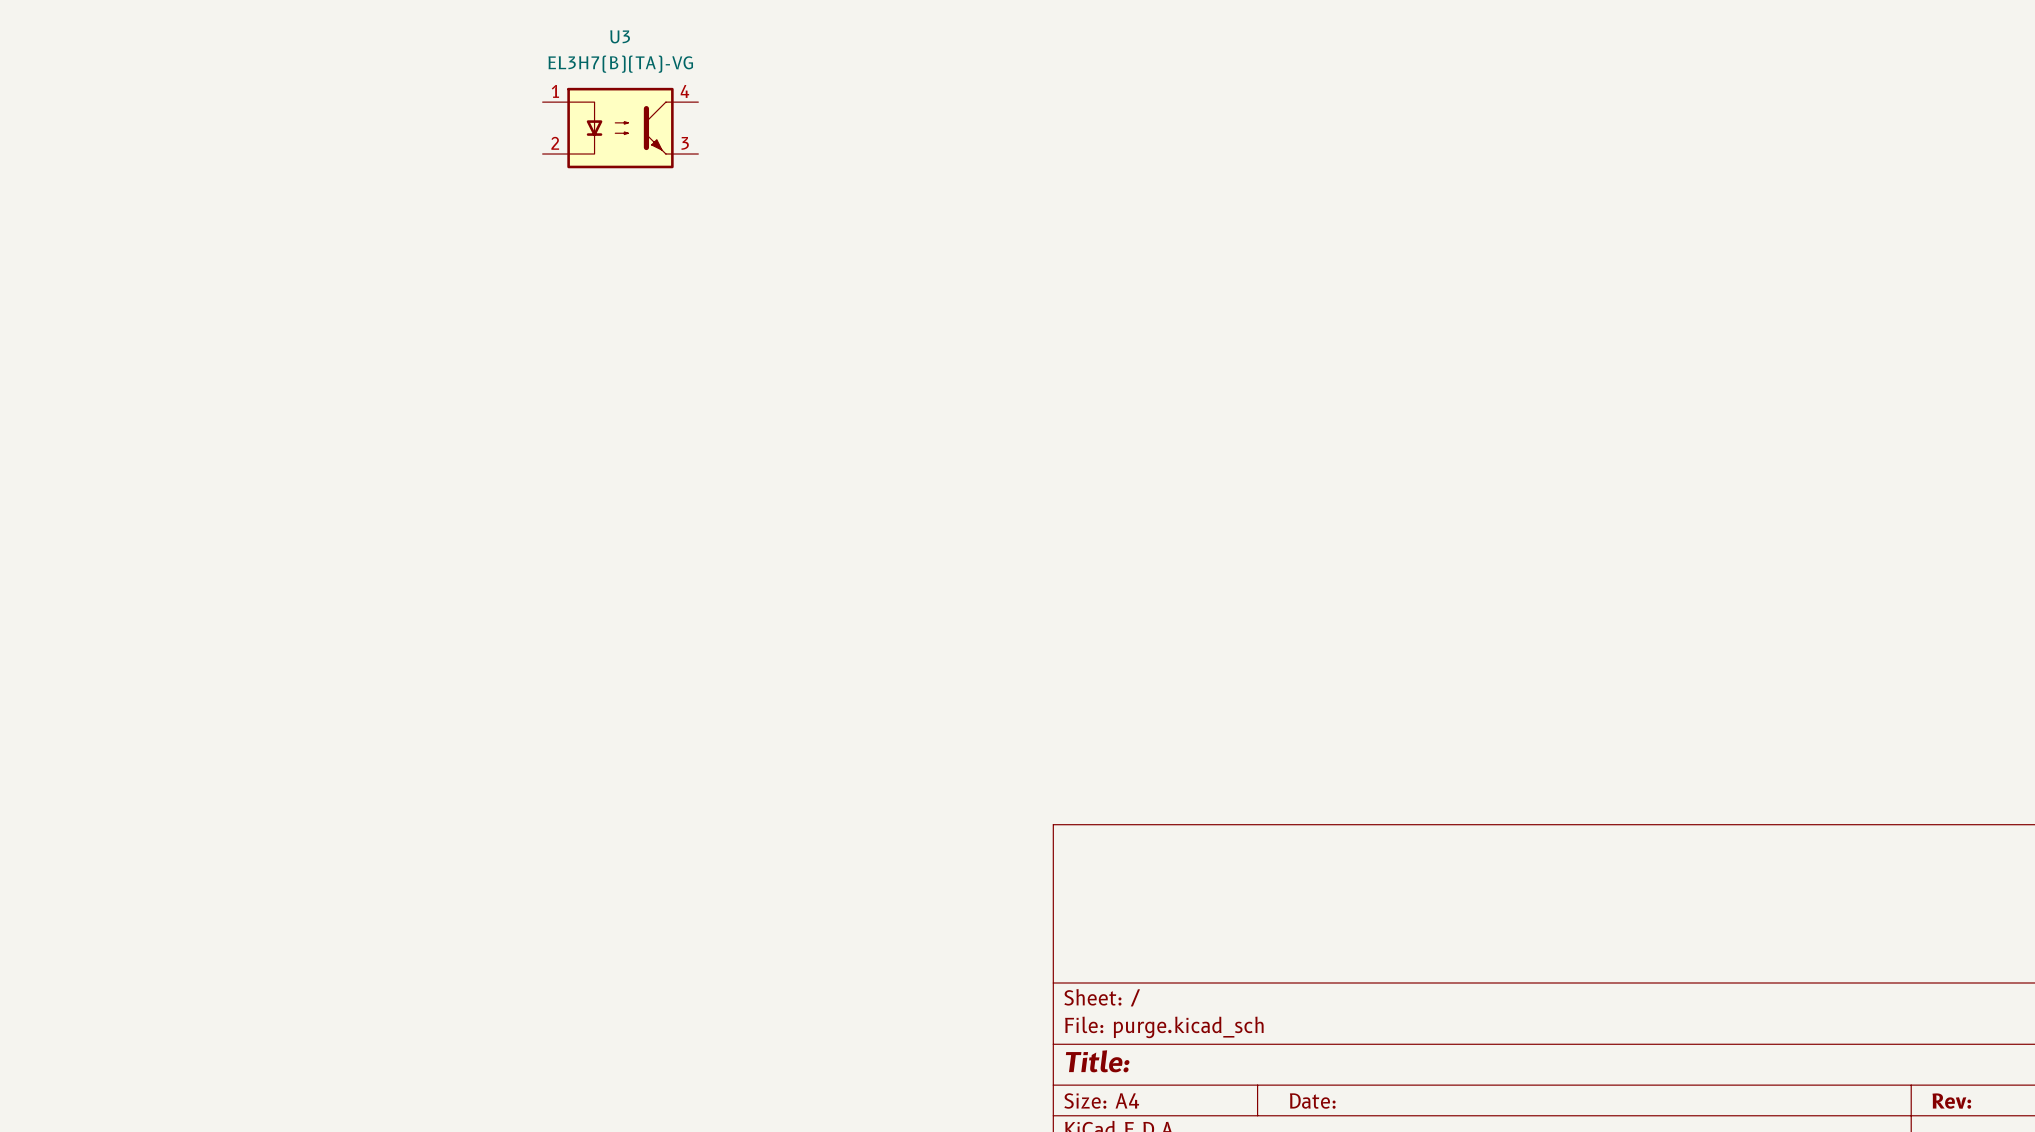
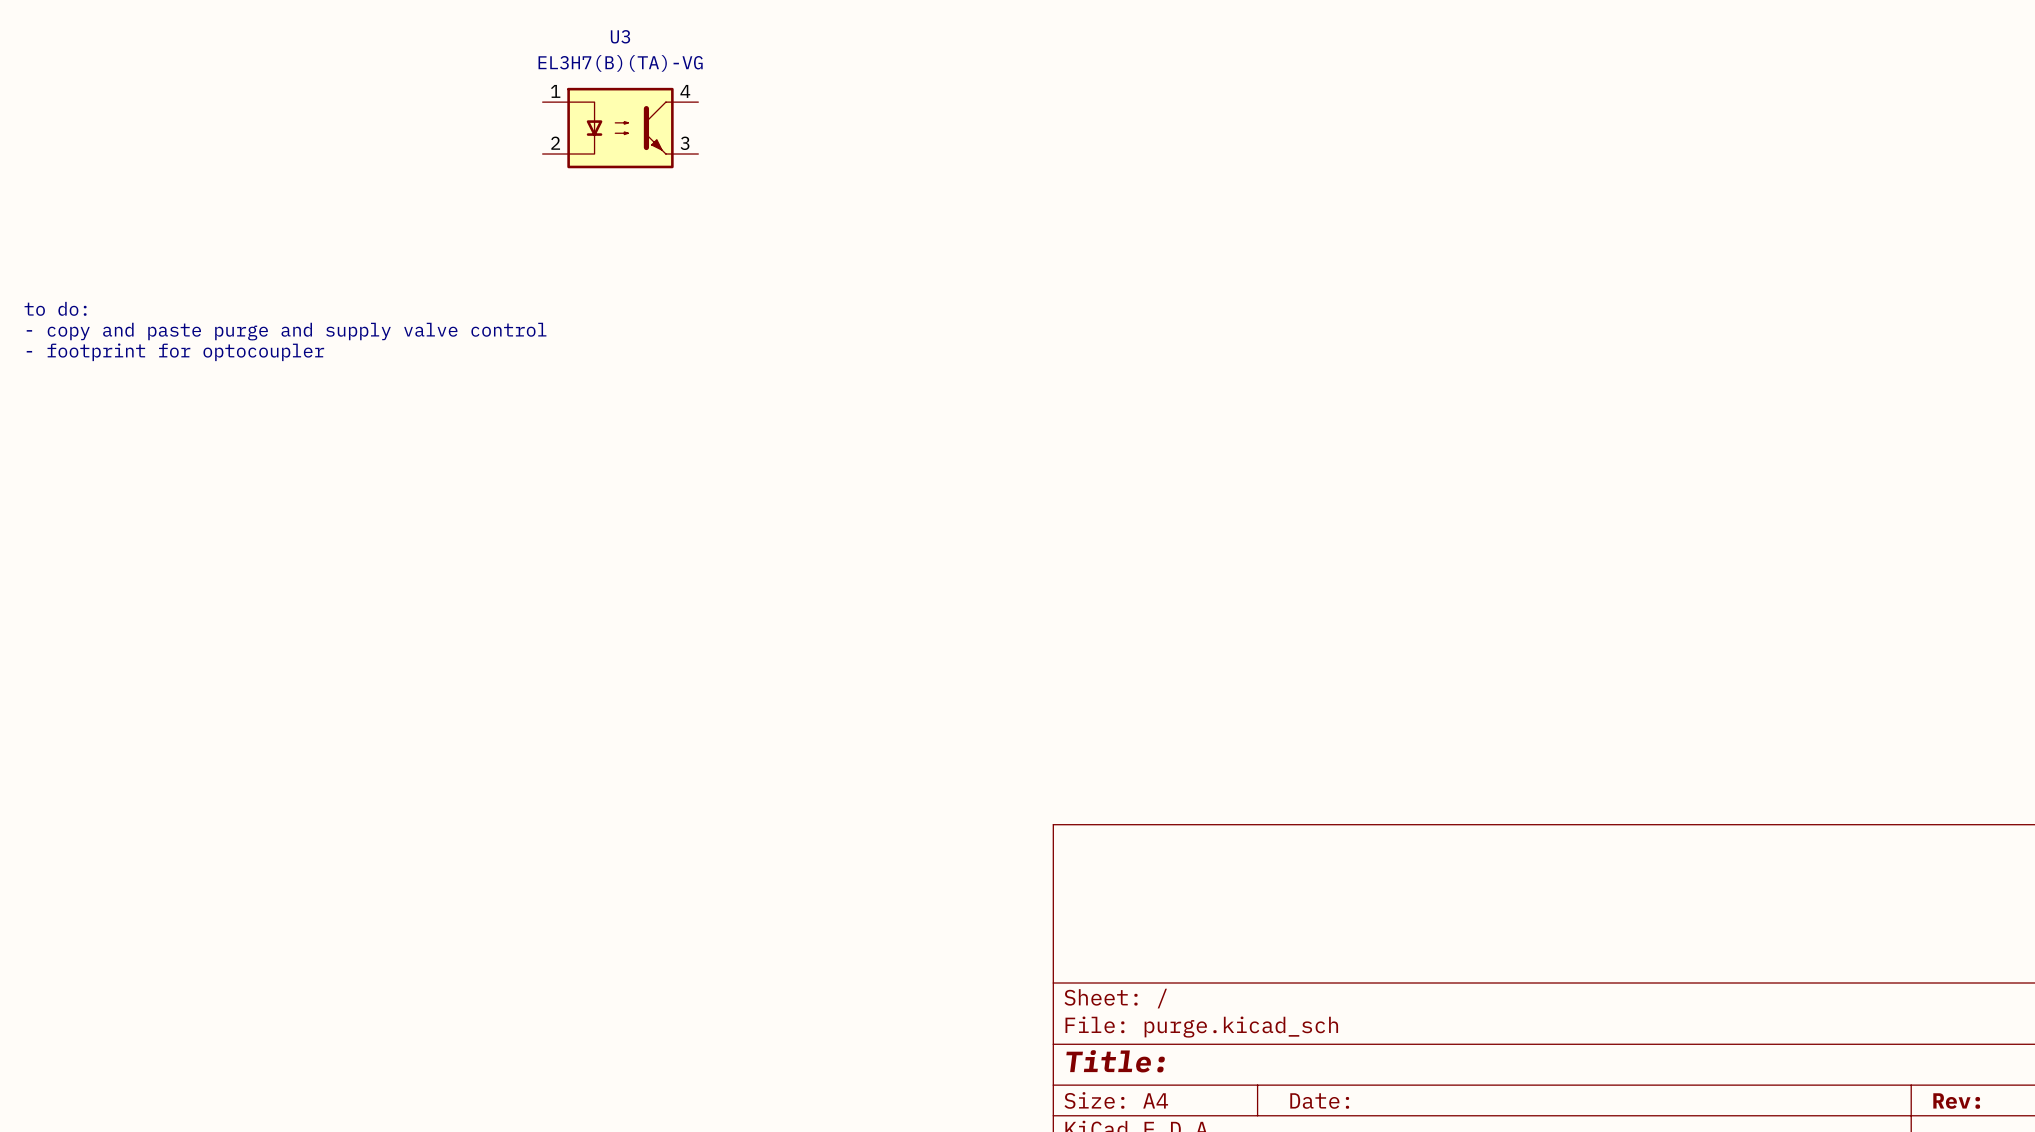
text: none -> to do: (55, 308)
text: none -> - copy and paste purge and supply valve control (286, 331)
text: none -> - footprint for optocoupler (175, 352)

